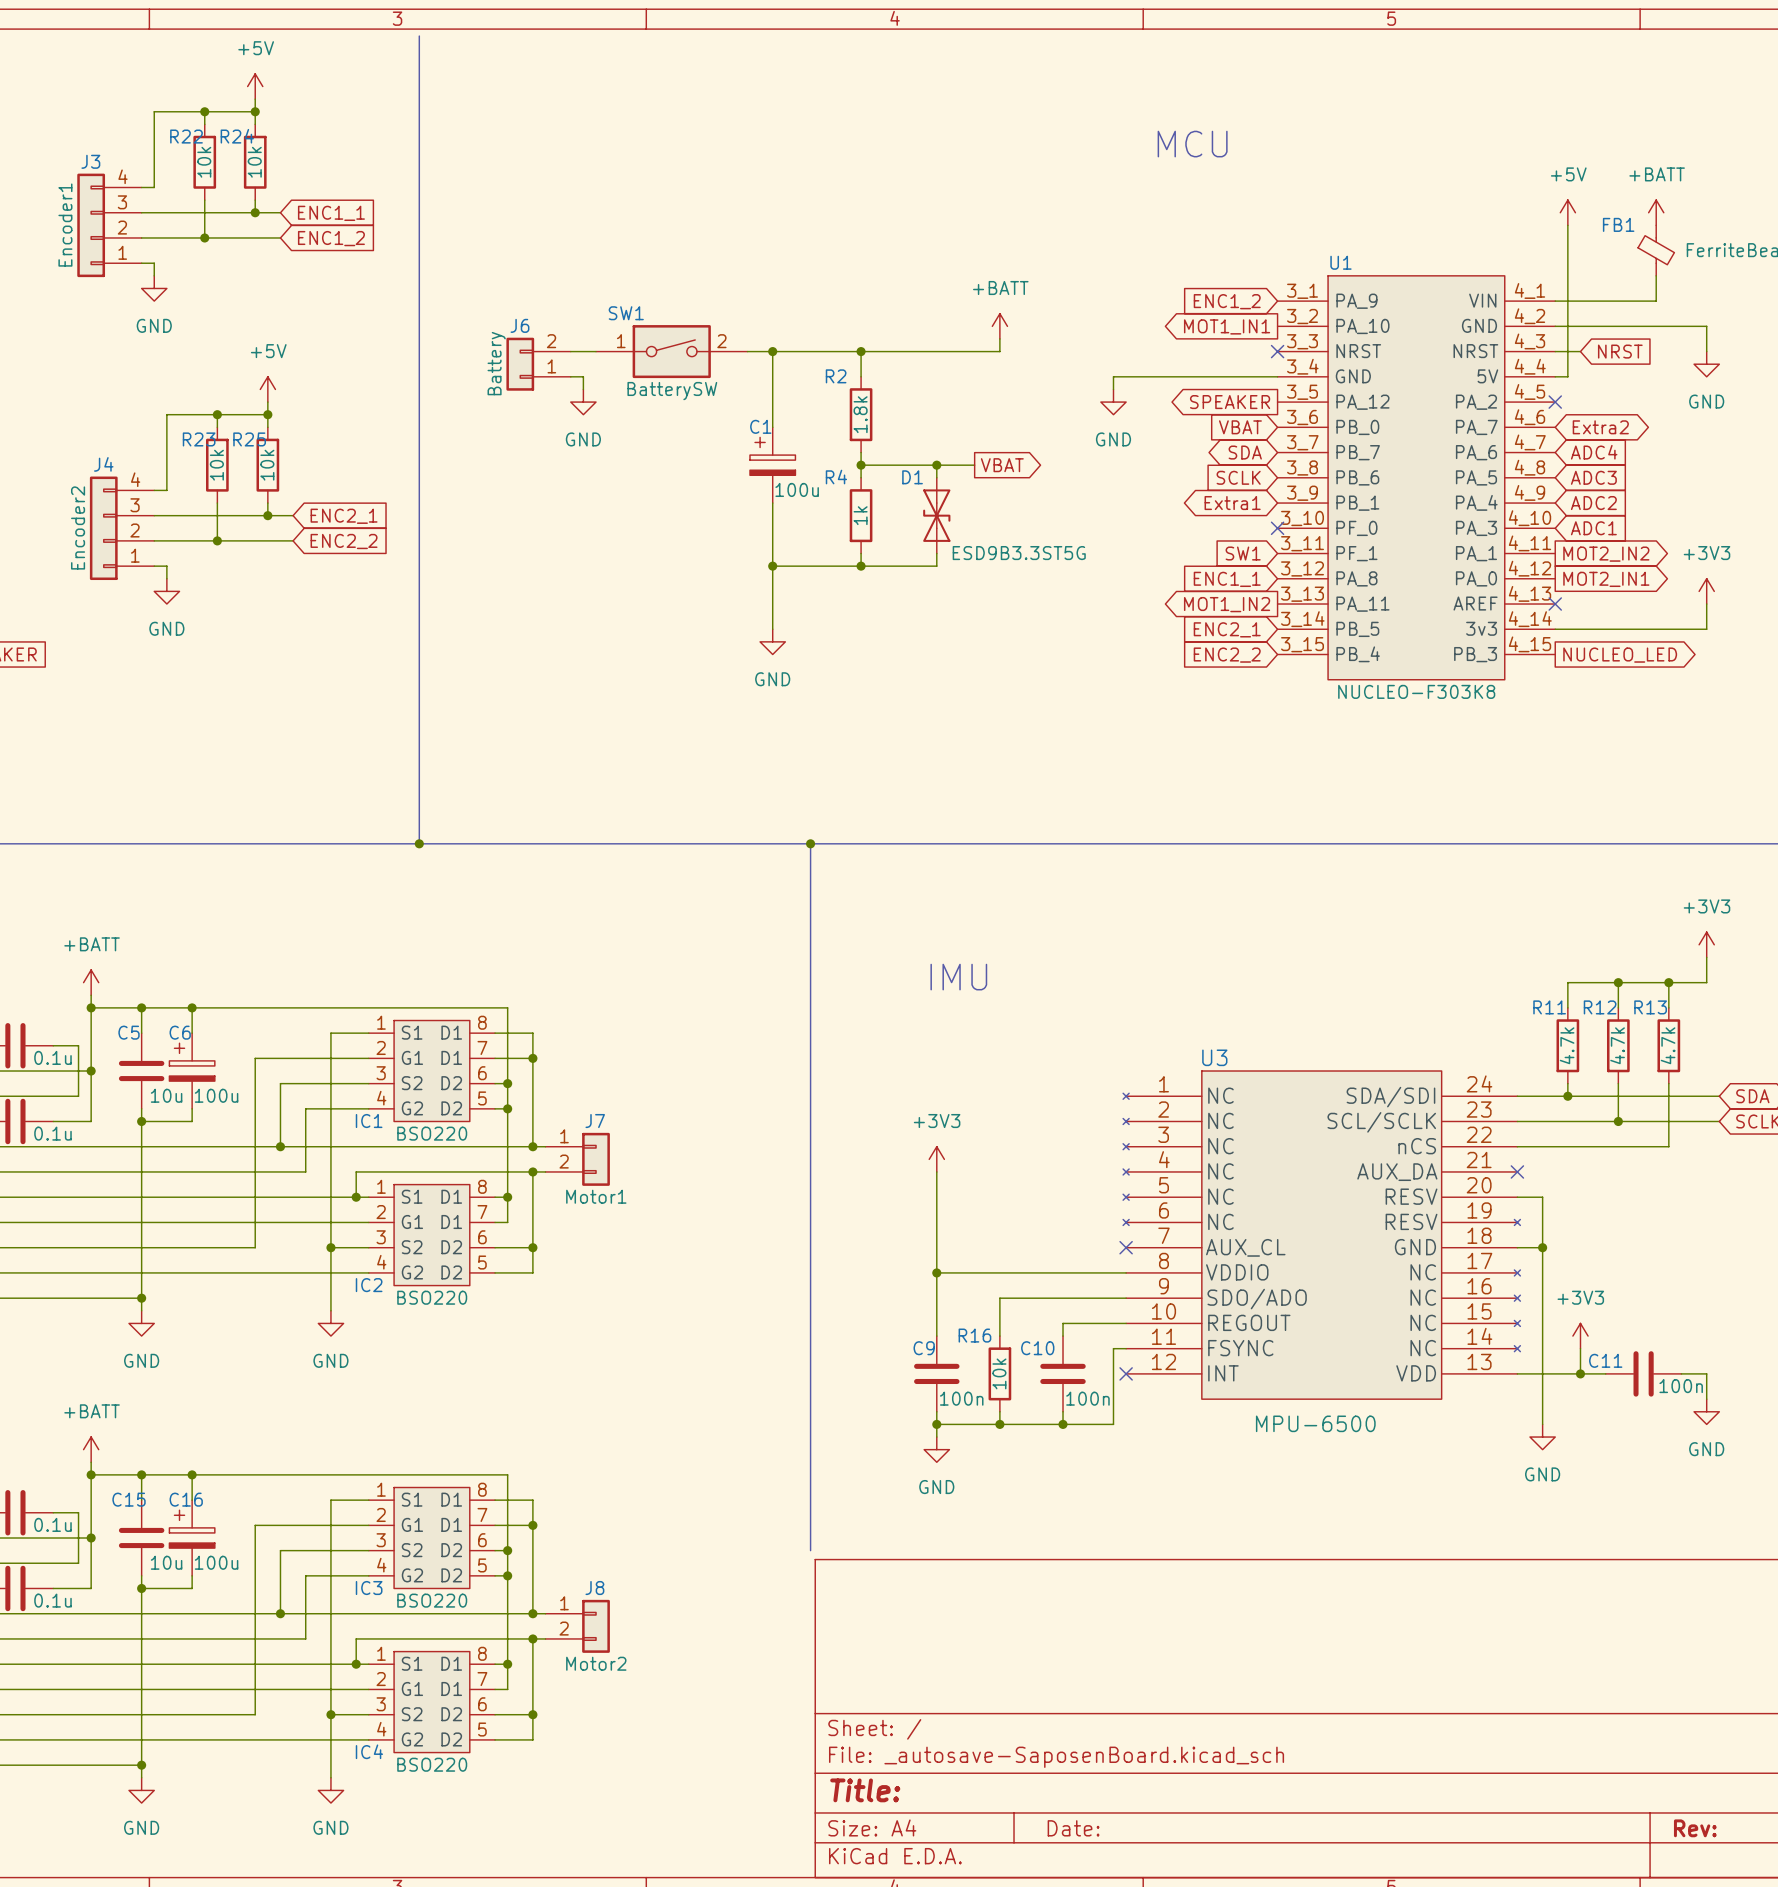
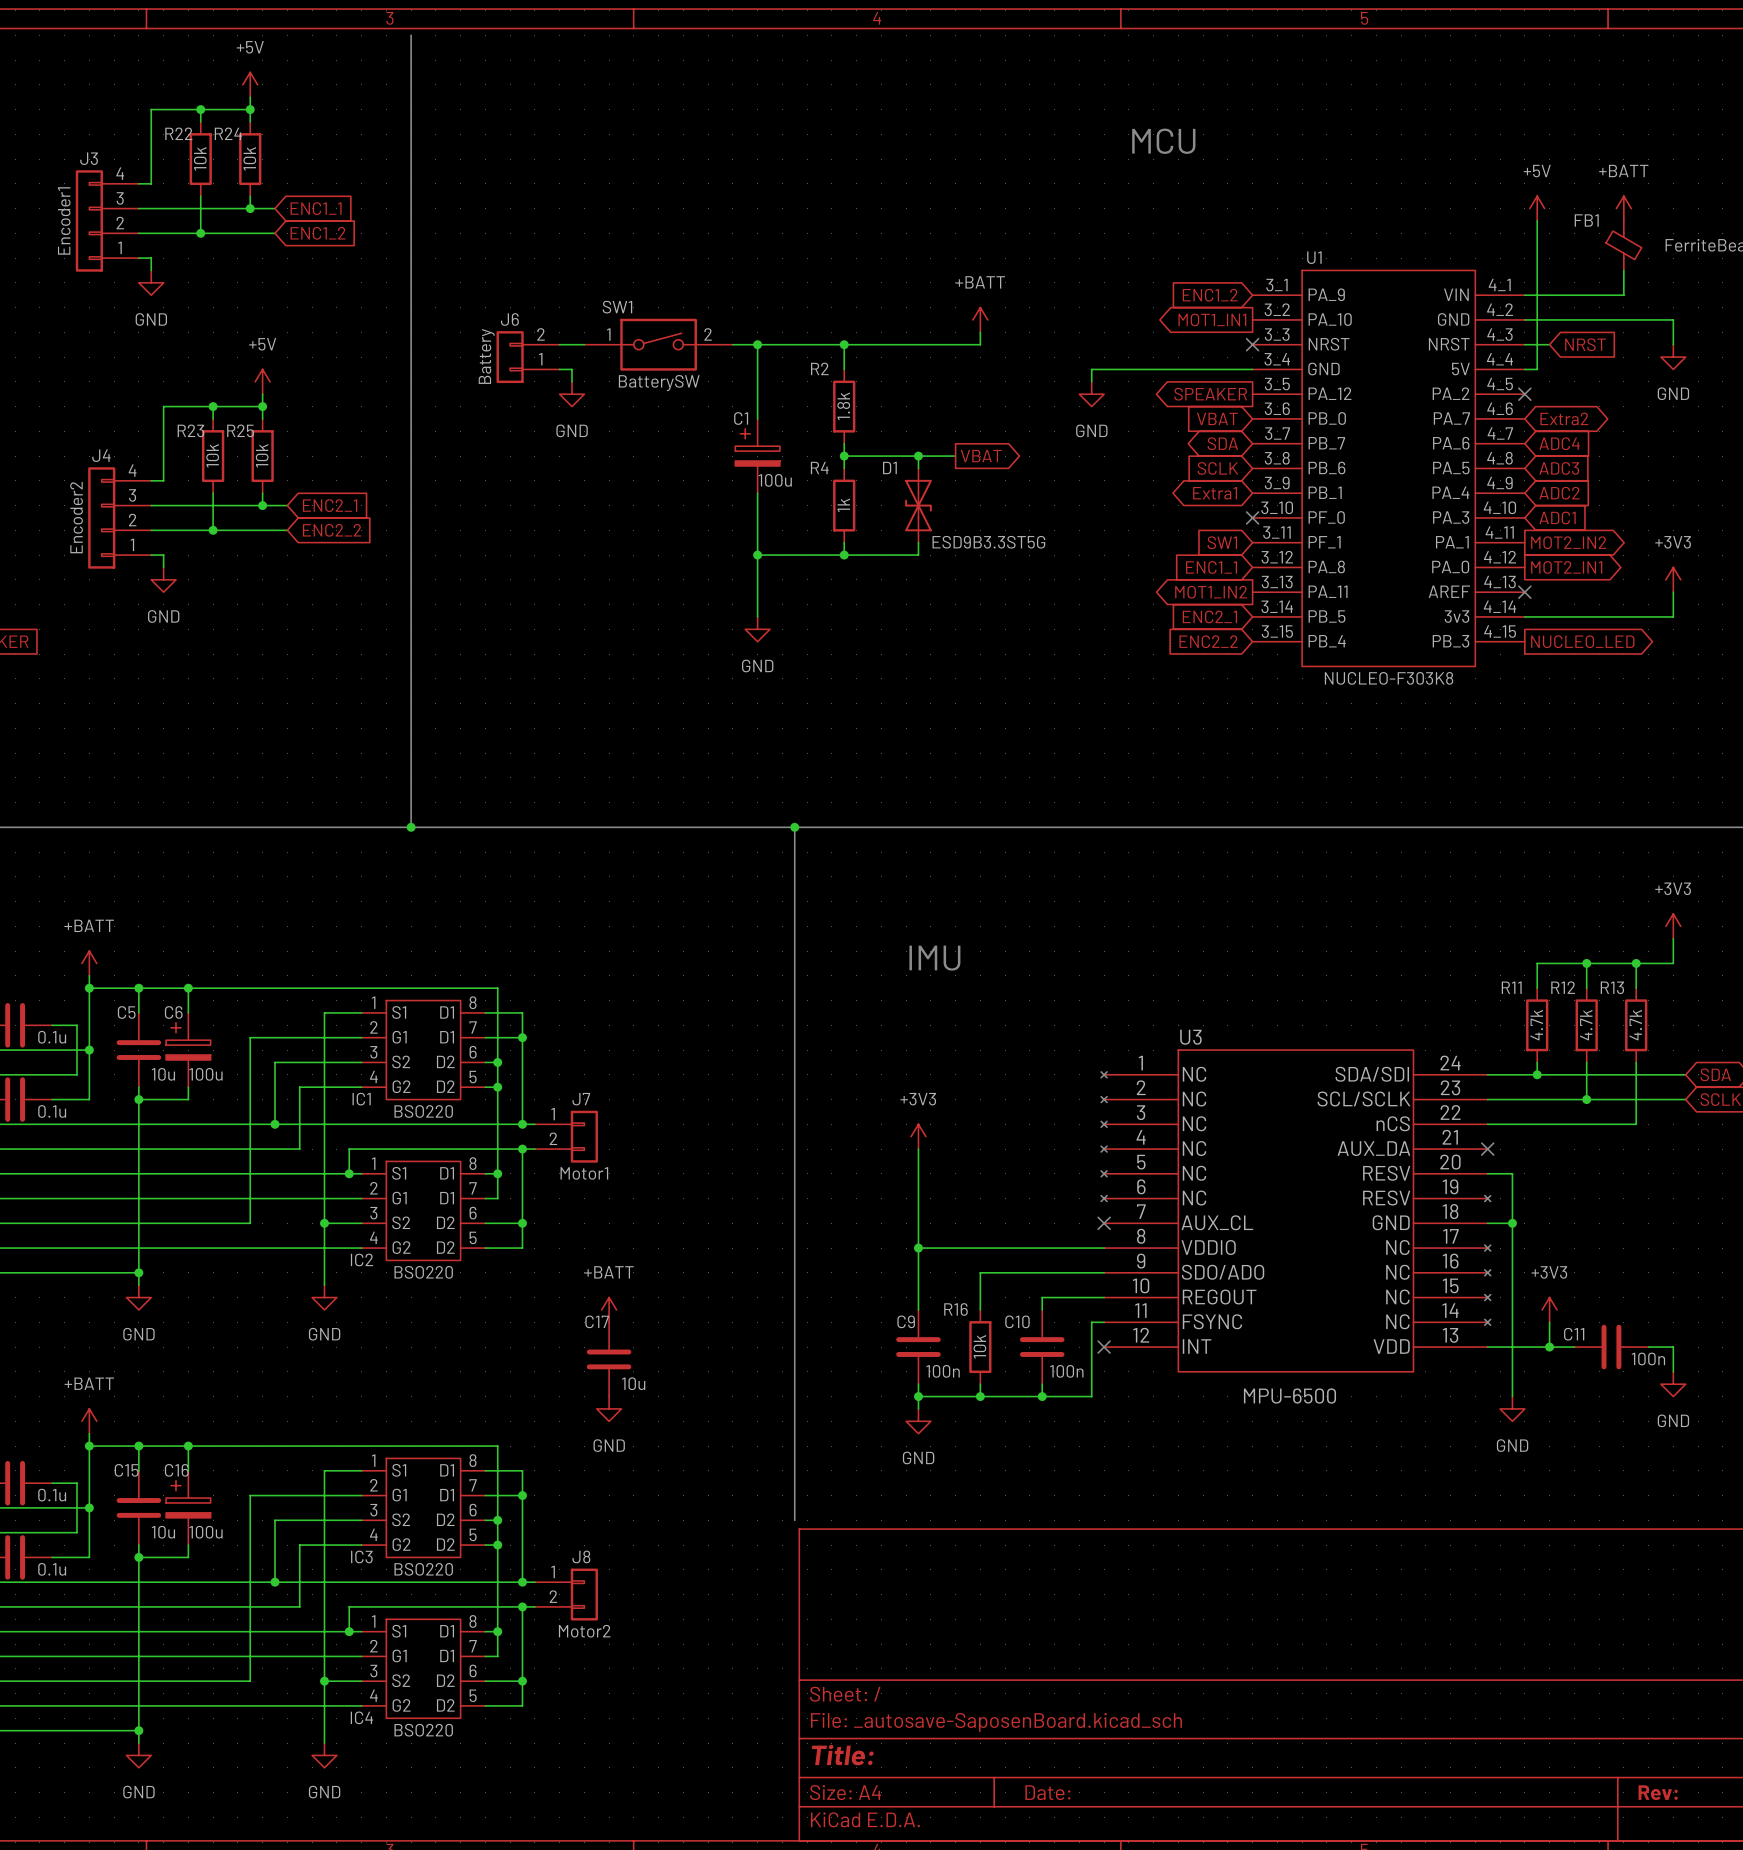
power symbol: none -> +BATT (609, 1309)
C17: none -> 10u (609, 1359)
power symbol: none -> GND (609, 1408)

